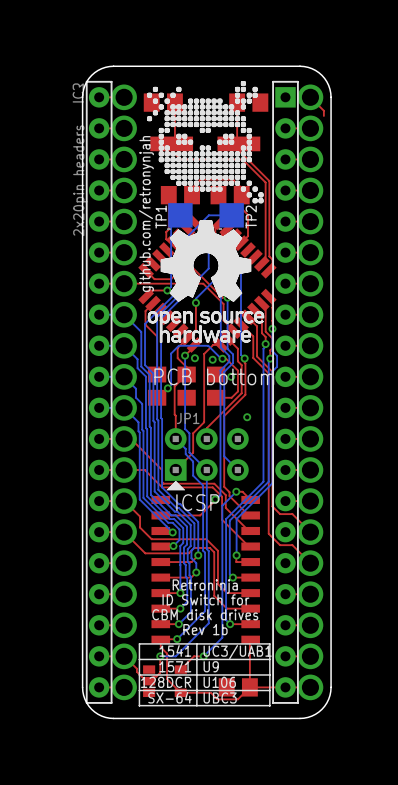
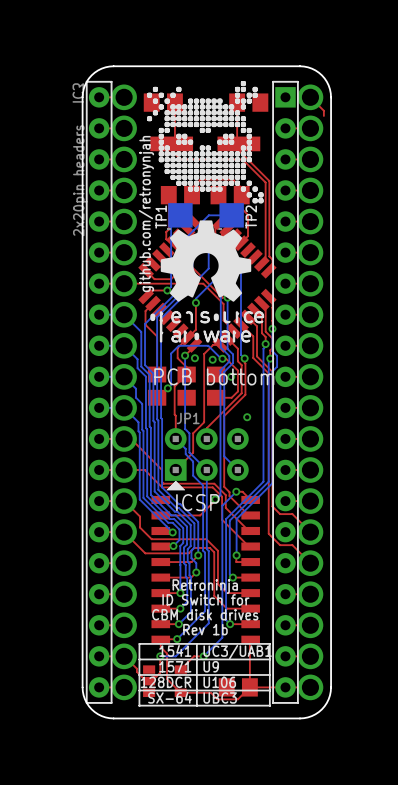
drawing shape: [147, 220, 265, 343] -> [150, 220, 265, 343]

